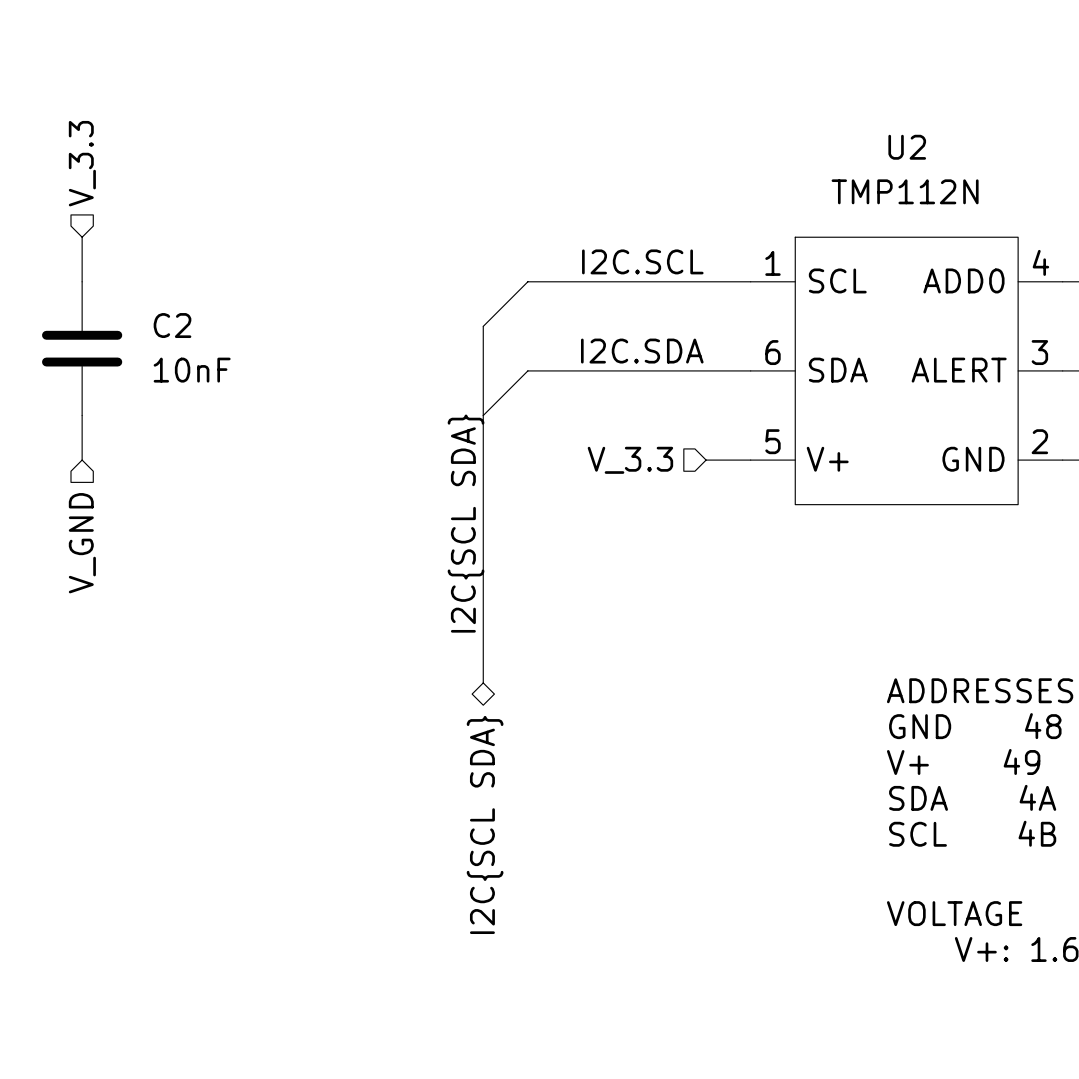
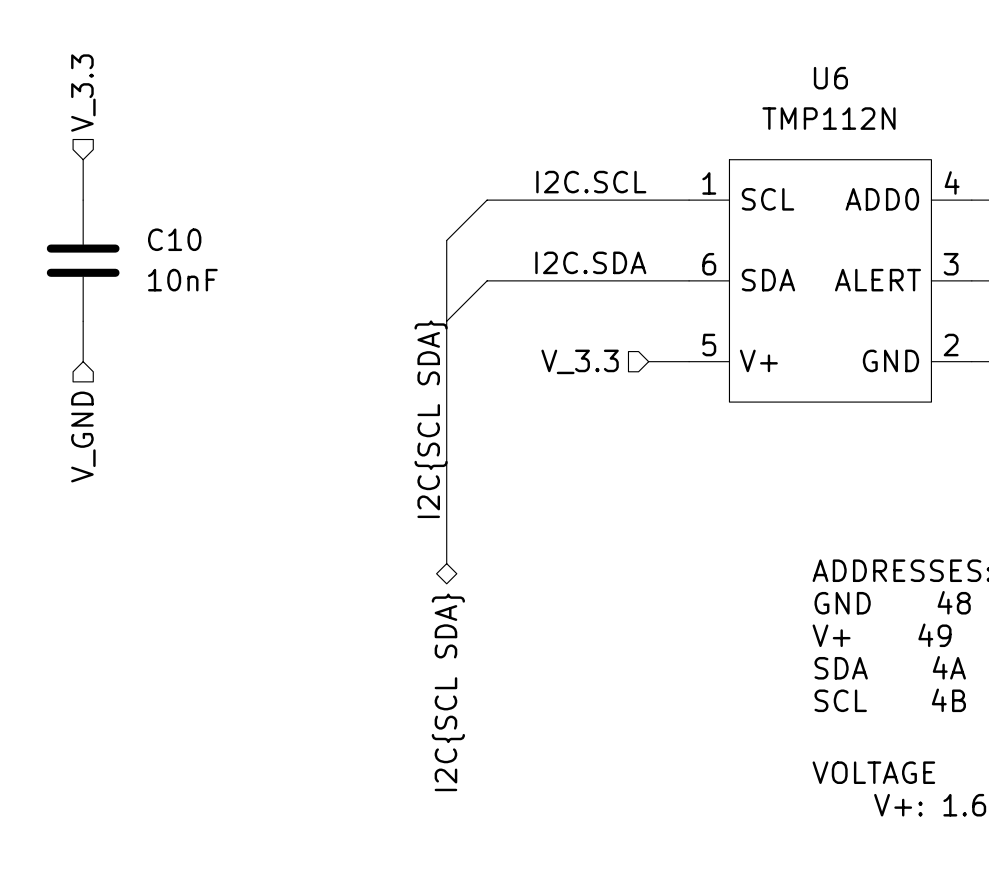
U2 name: U2 (907, 147) -> U6 (830, 78)
C2 name: C2 (172, 325) -> C10 (174, 239)

